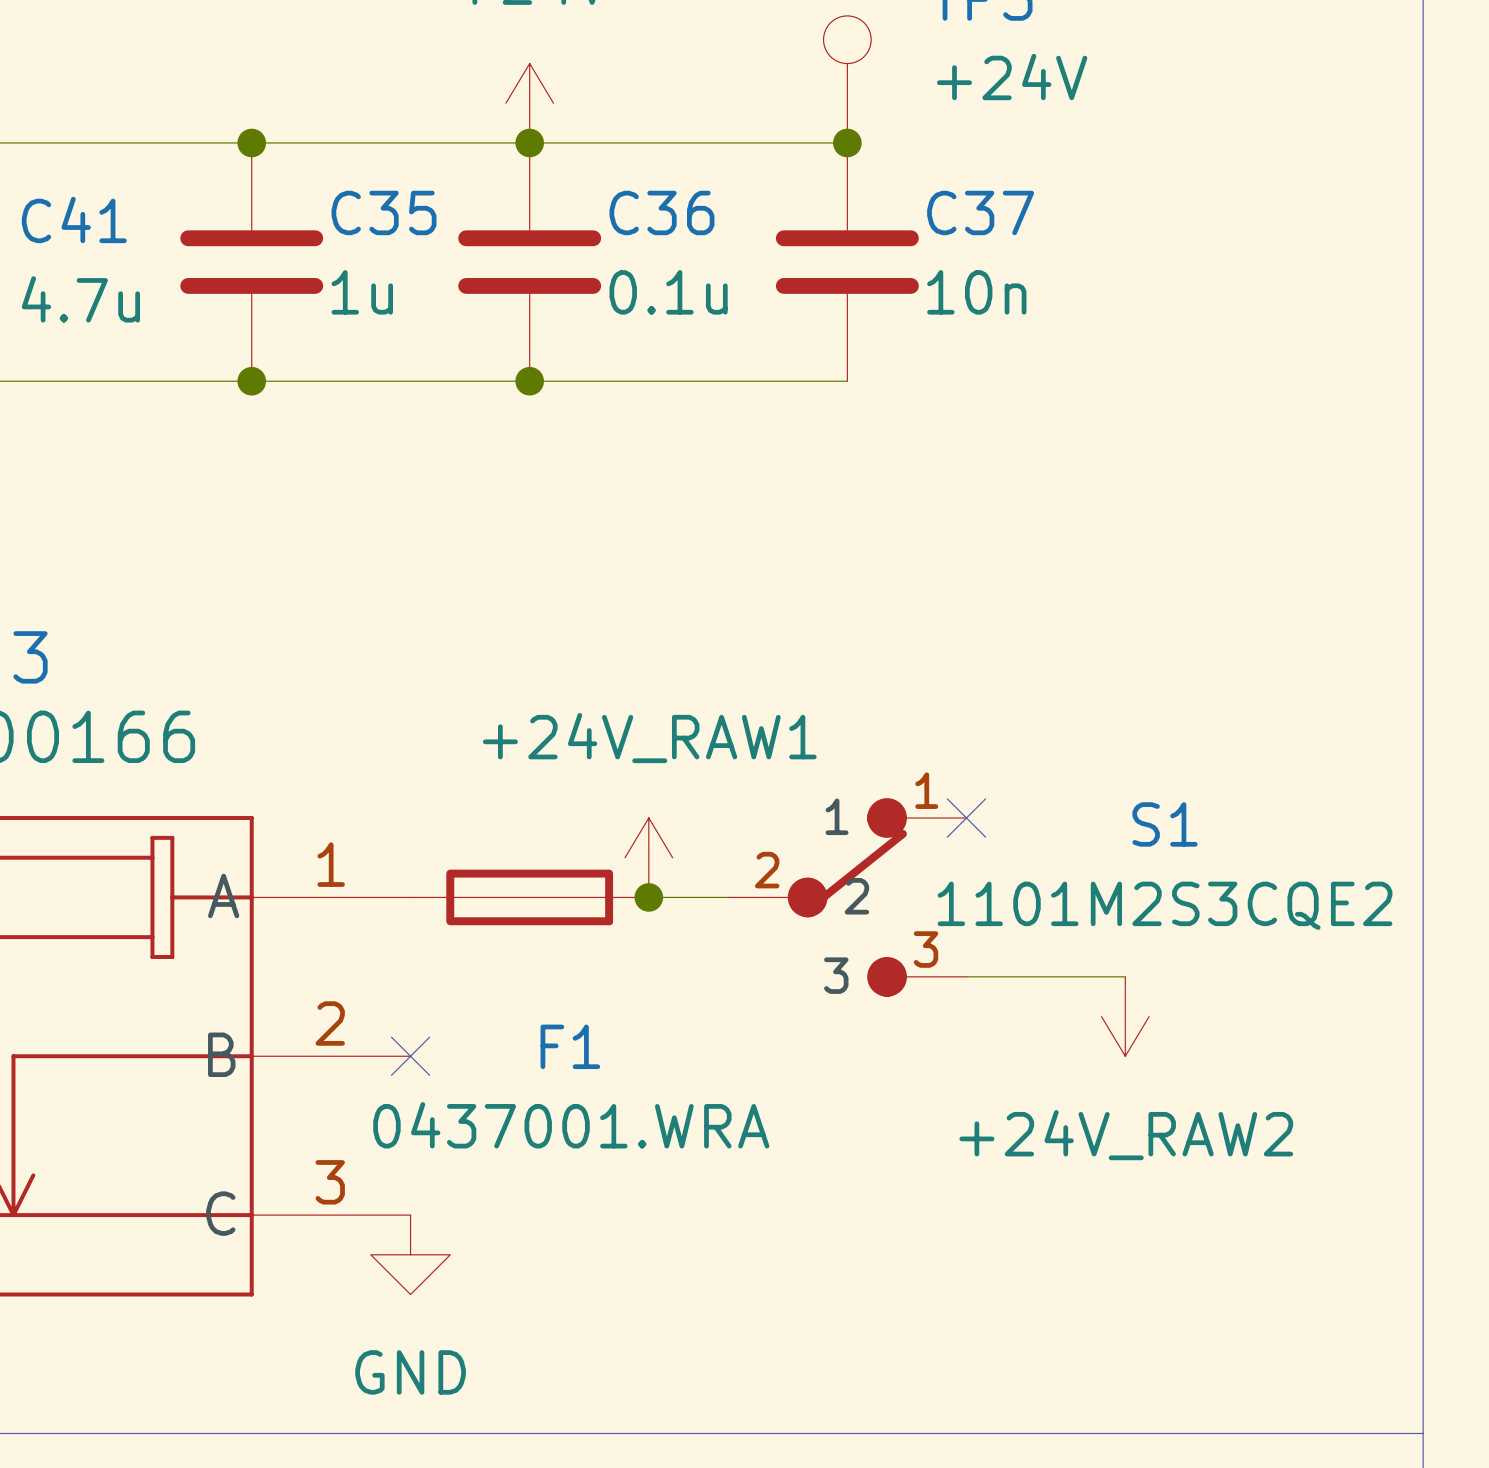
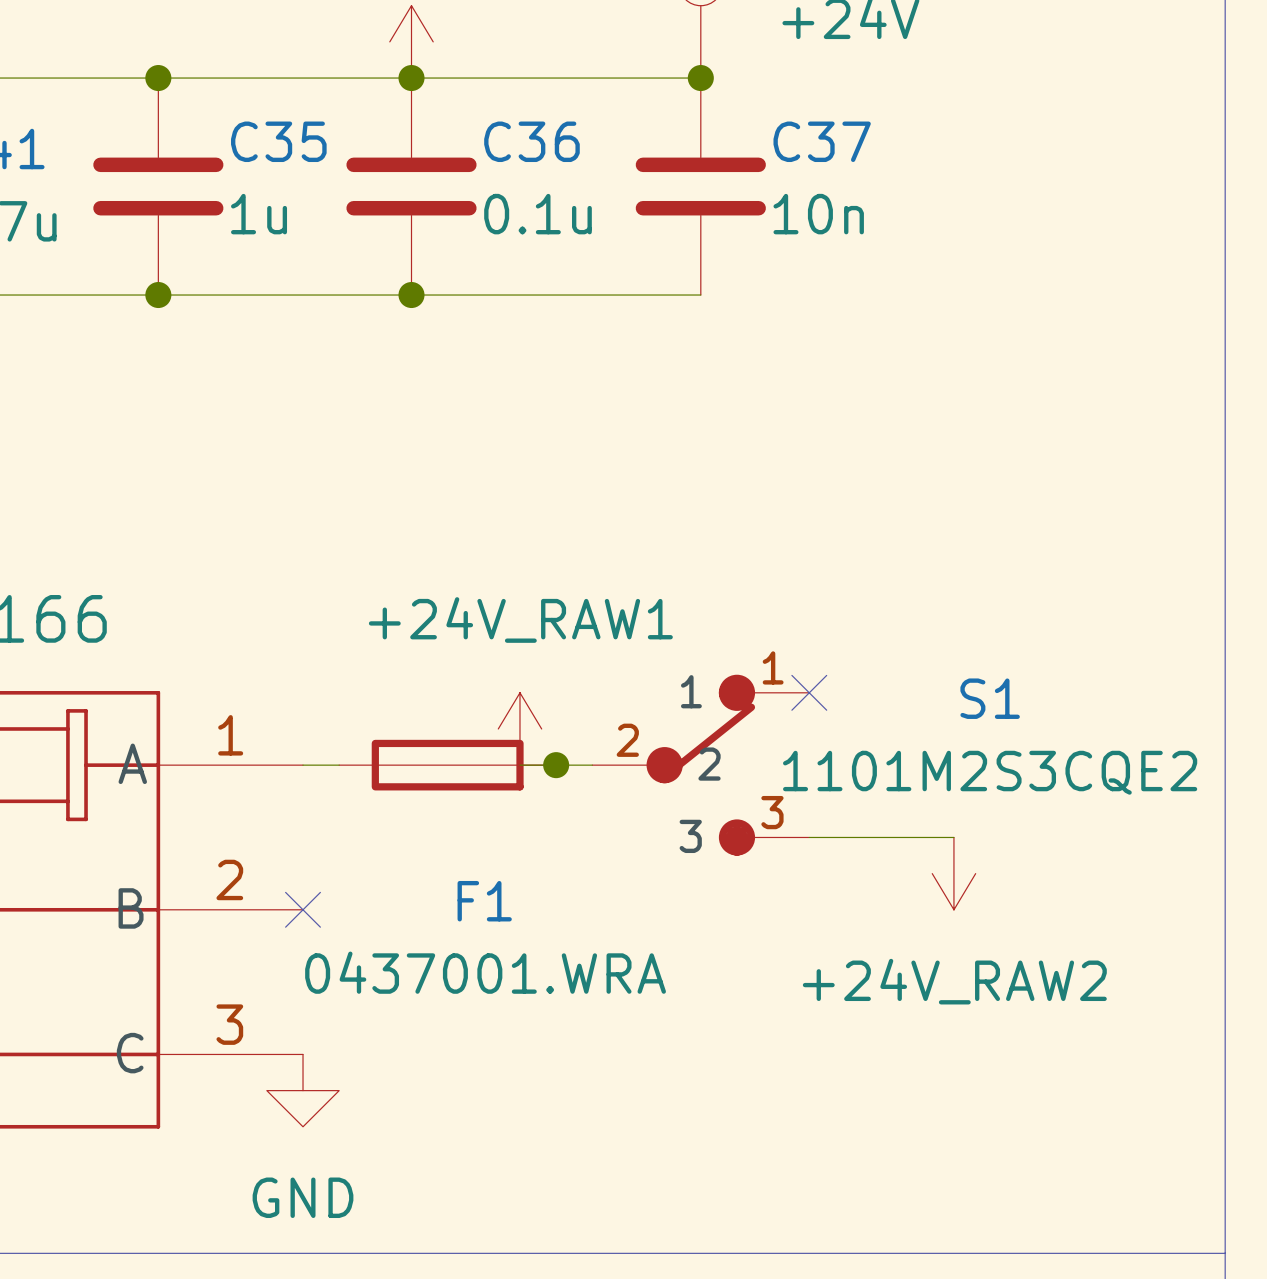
F1 position: (529, 897) -> (447, 765)
junction position: (648, 897) -> (556, 765)

